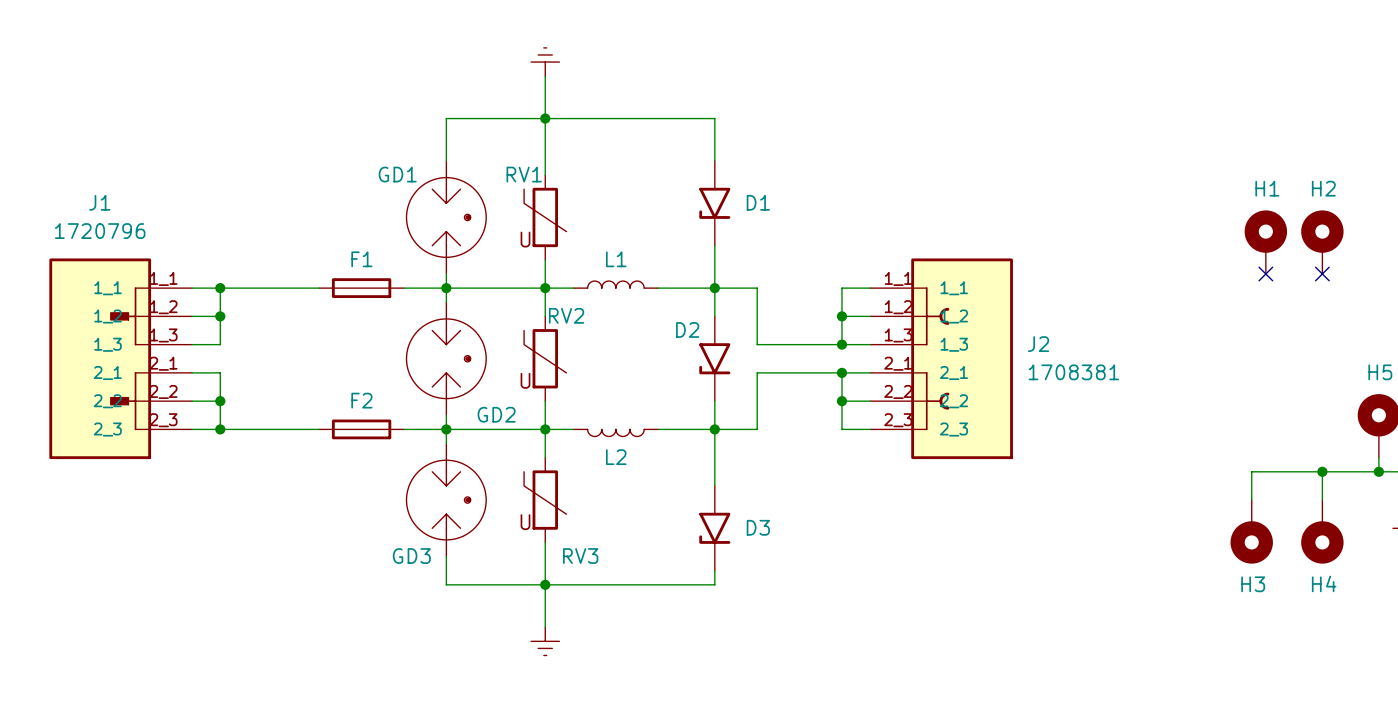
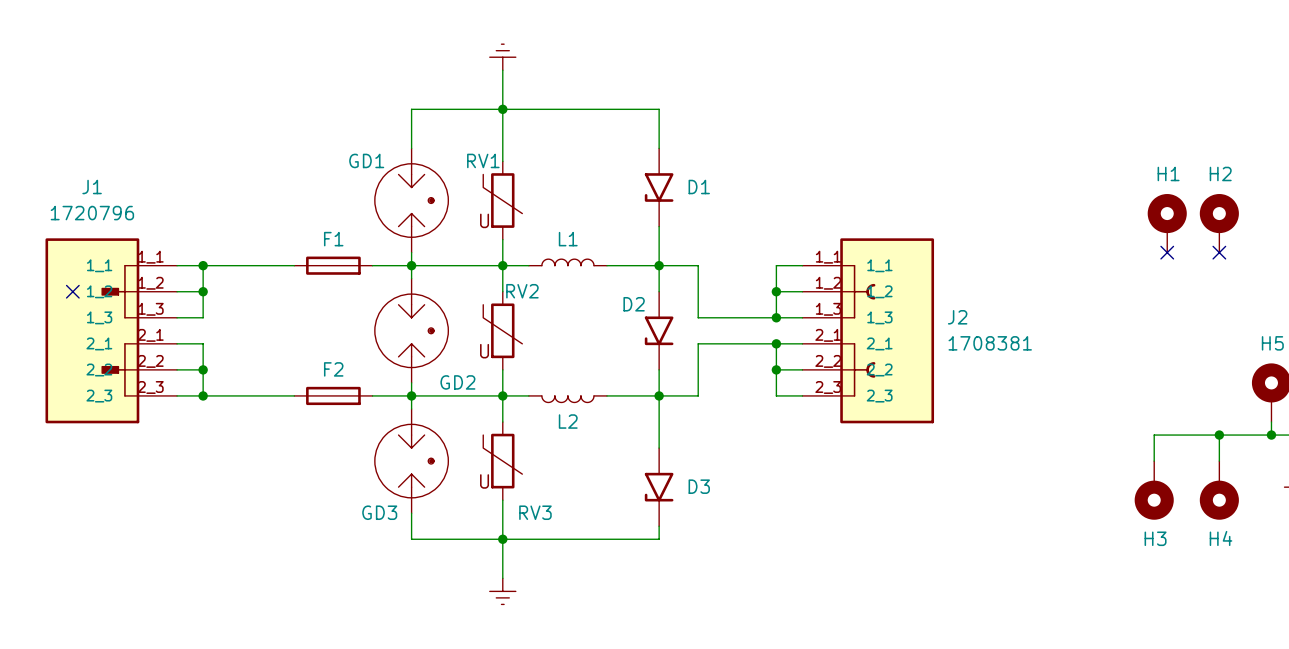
no-connect mark: none -> (72, 291)

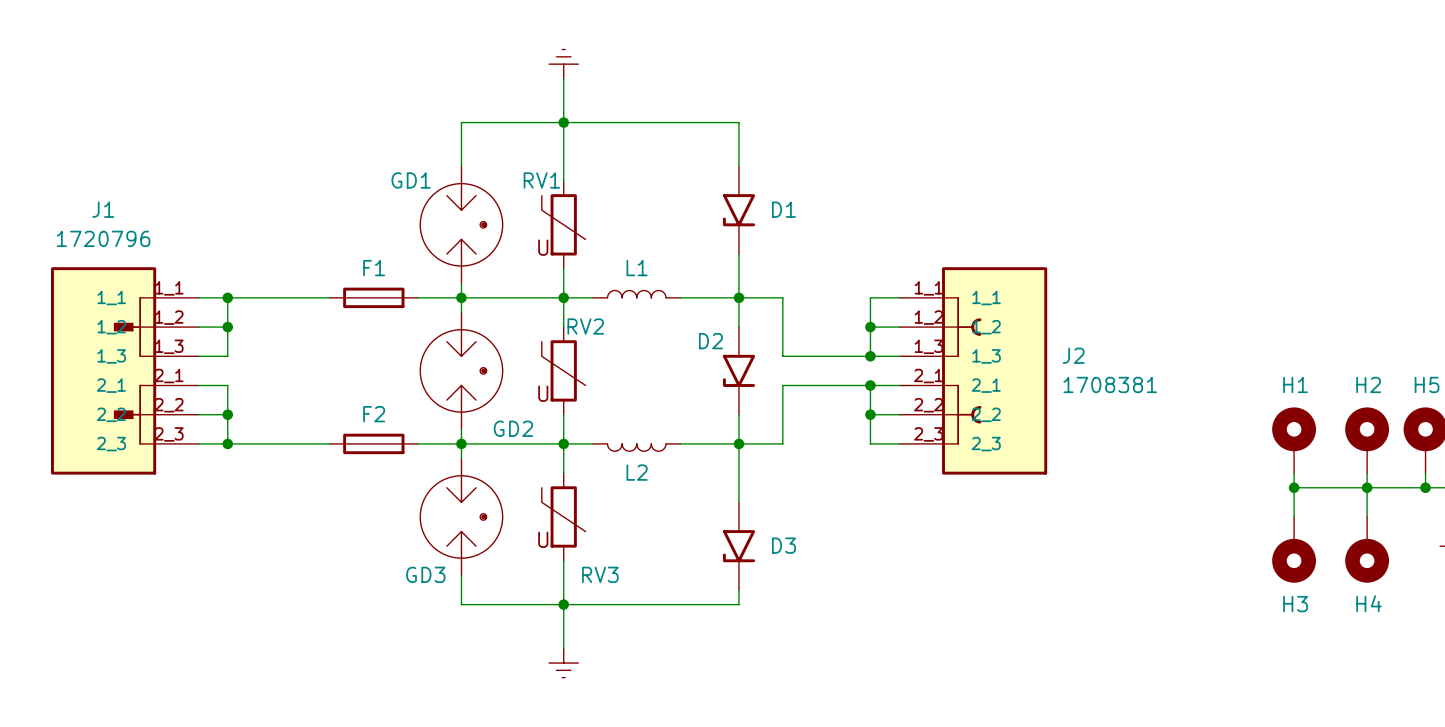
H1 position: (1167, 223) -> (1294, 440)
H2 position: (1219, 223) -> (1367, 440)
no-connect mark: (1167, 252) -> none
no-connect mark: (1219, 252) -> none
no-connect mark: (72, 291) -> none
wire: none -> (1294, 473) (1294, 487)
wire: none -> (1367, 473) (1367, 487)
junction: none -> (1294, 487)

